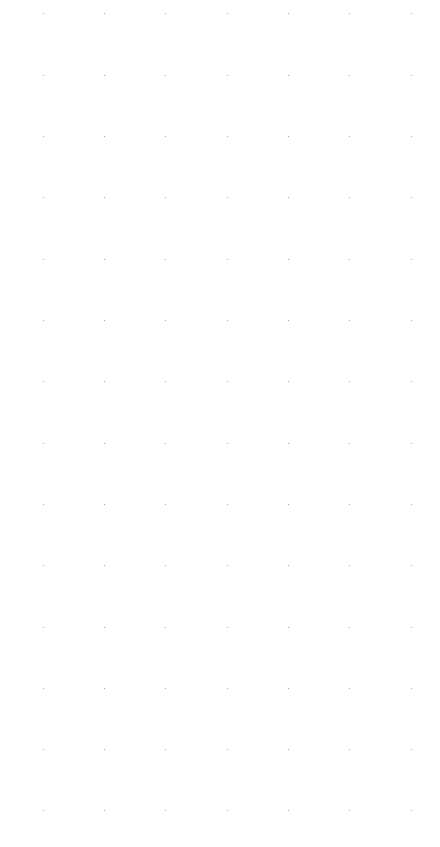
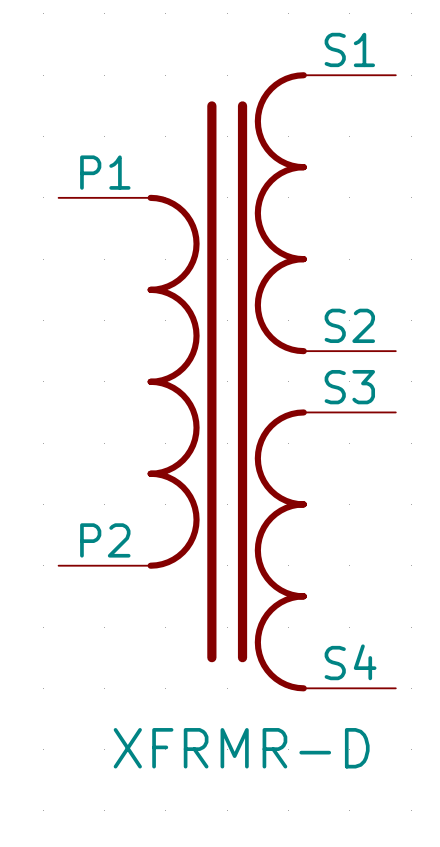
part: none -> XFRMR-D (227, 381)

